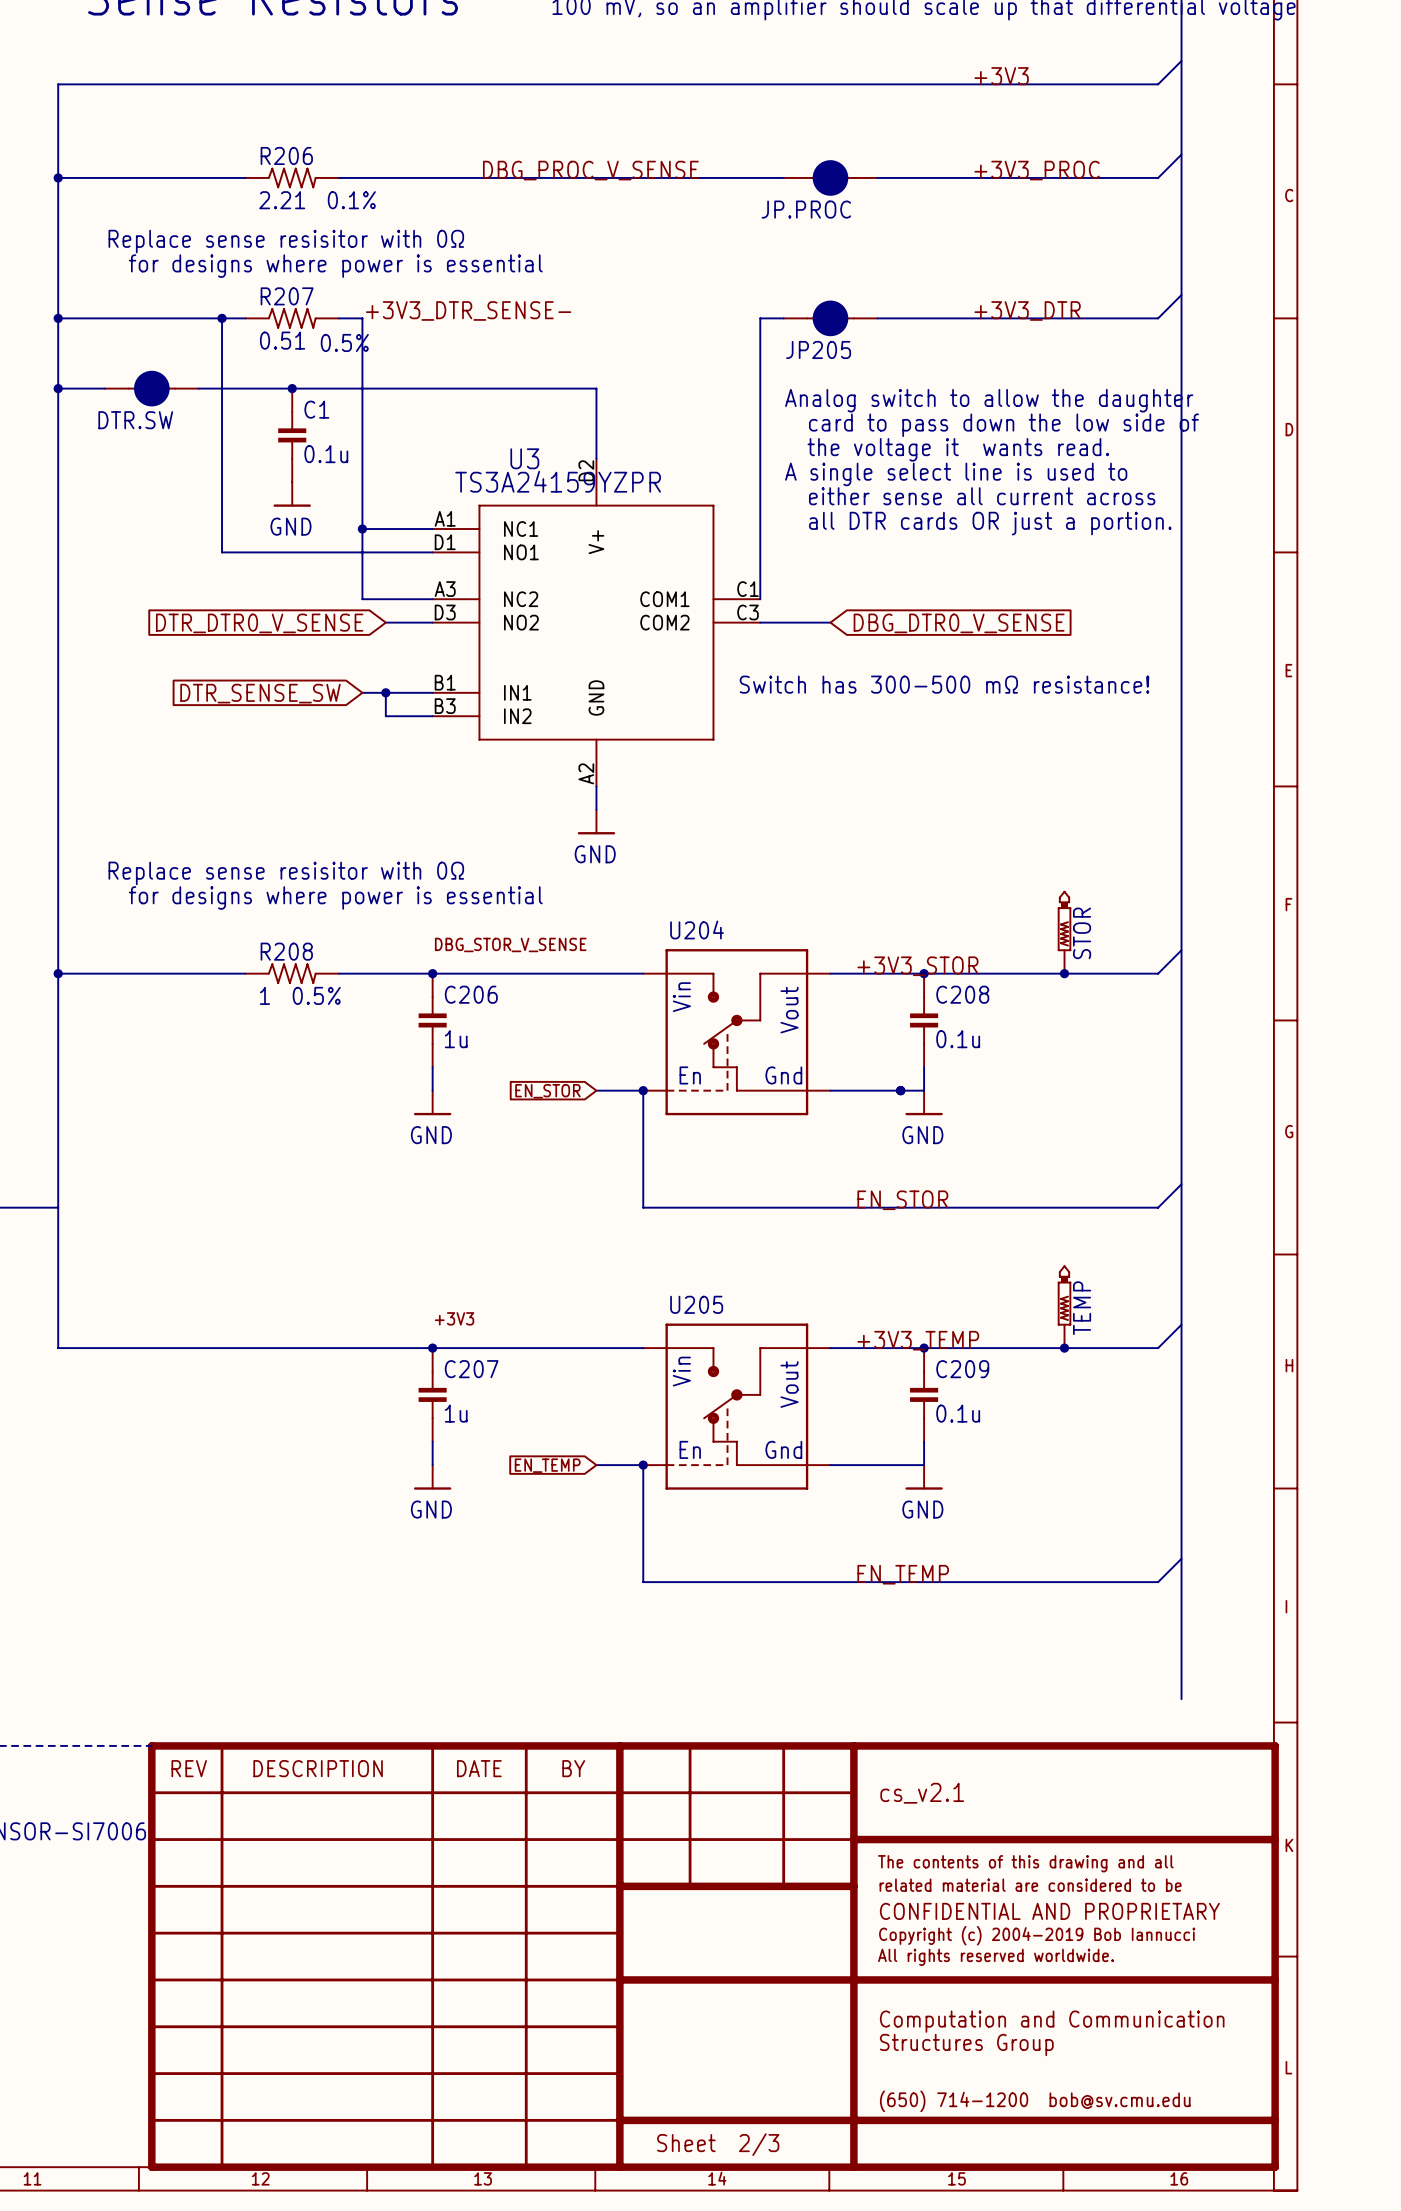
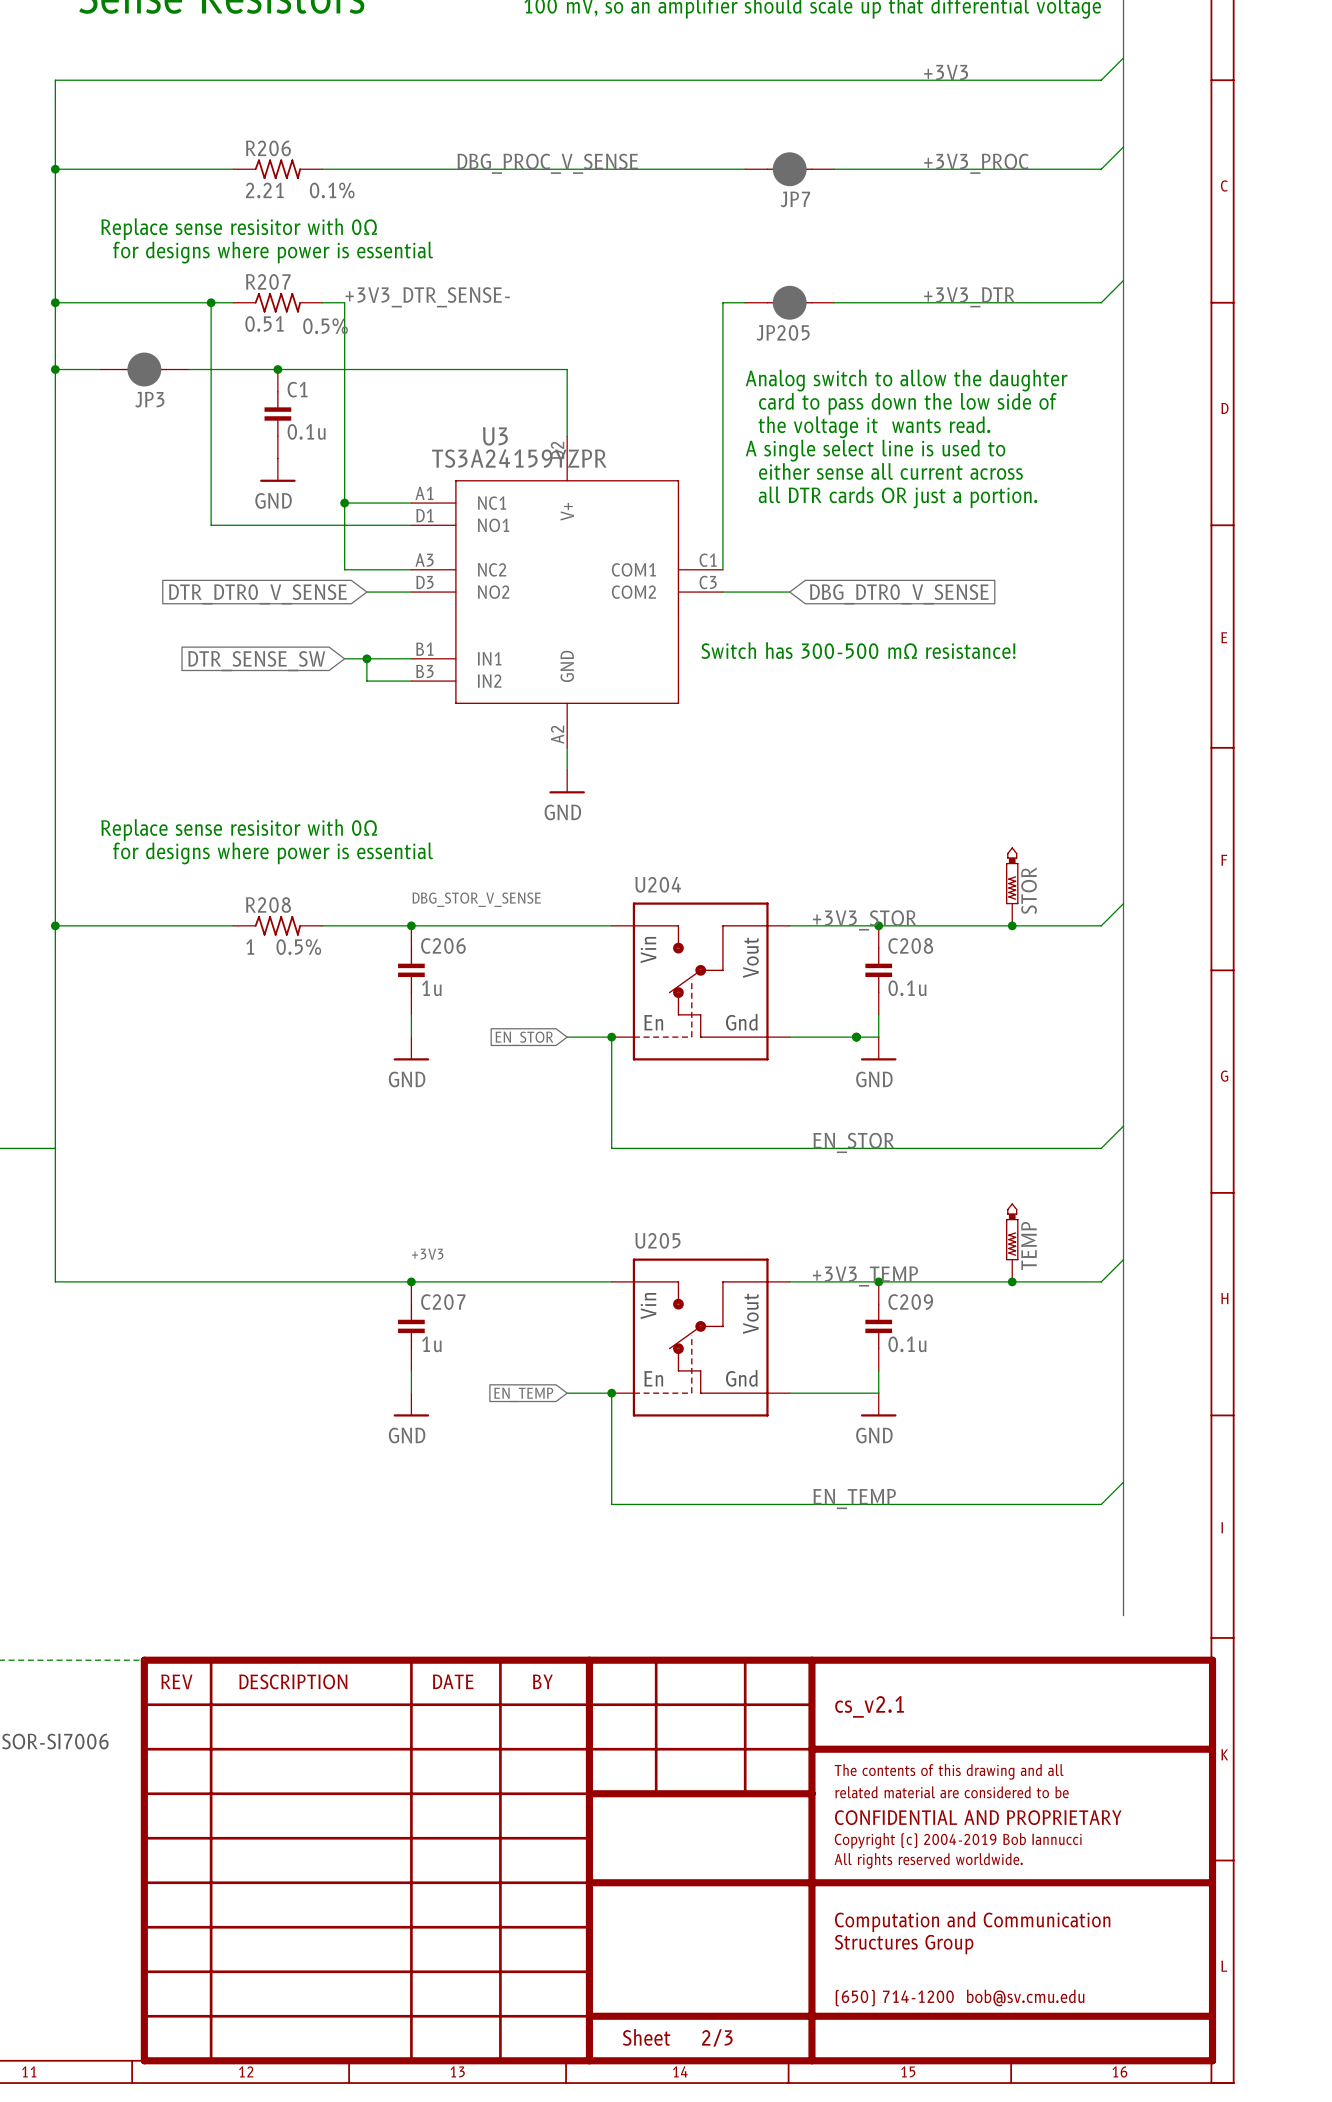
JP.PROC name: JP.PROC (806, 209) -> JP7 (795, 199)
DTR.SW name: DTR.SW (135, 420) -> JP3 (149, 399)

